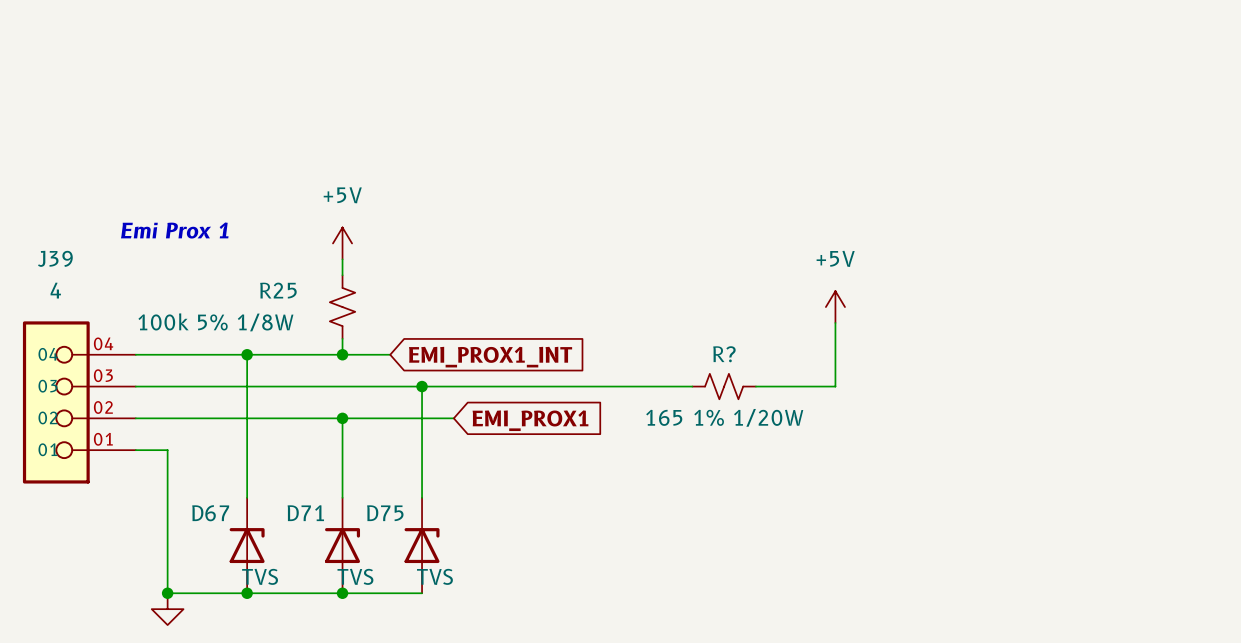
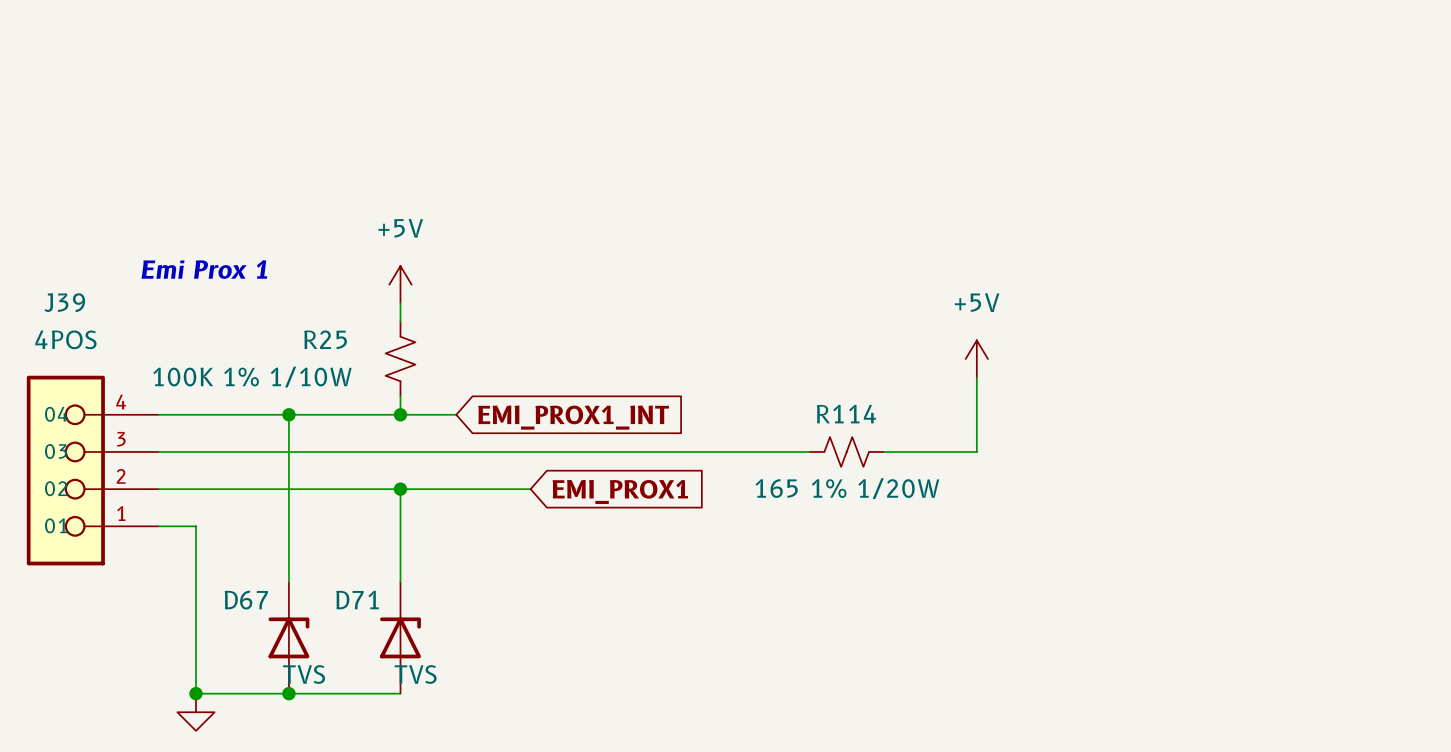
J39 value: 4 (55, 290) -> 4POS (65, 339)
R25 value: 100k 5% 1/8W (215, 322) -> 100K 1% 1/10W (252, 377)
J39 pin number: 04 (103, 343) -> 4 (121, 402)
R? name: R? (724, 354) -> R114 (846, 414)
J39 pin number: 03 (103, 375) -> 3 (121, 439)
wire: (422, 386) (422, 497) -> none
junction: (422, 386) -> none
J39 pin number: 02 (103, 407) -> 2 (121, 476)
J39 pin number: 01 (103, 439) -> 1 (121, 513)
D75: TVS (422, 545) -> none
wire: (342, 593) (422, 593) -> none
junction: (342, 593) -> none

